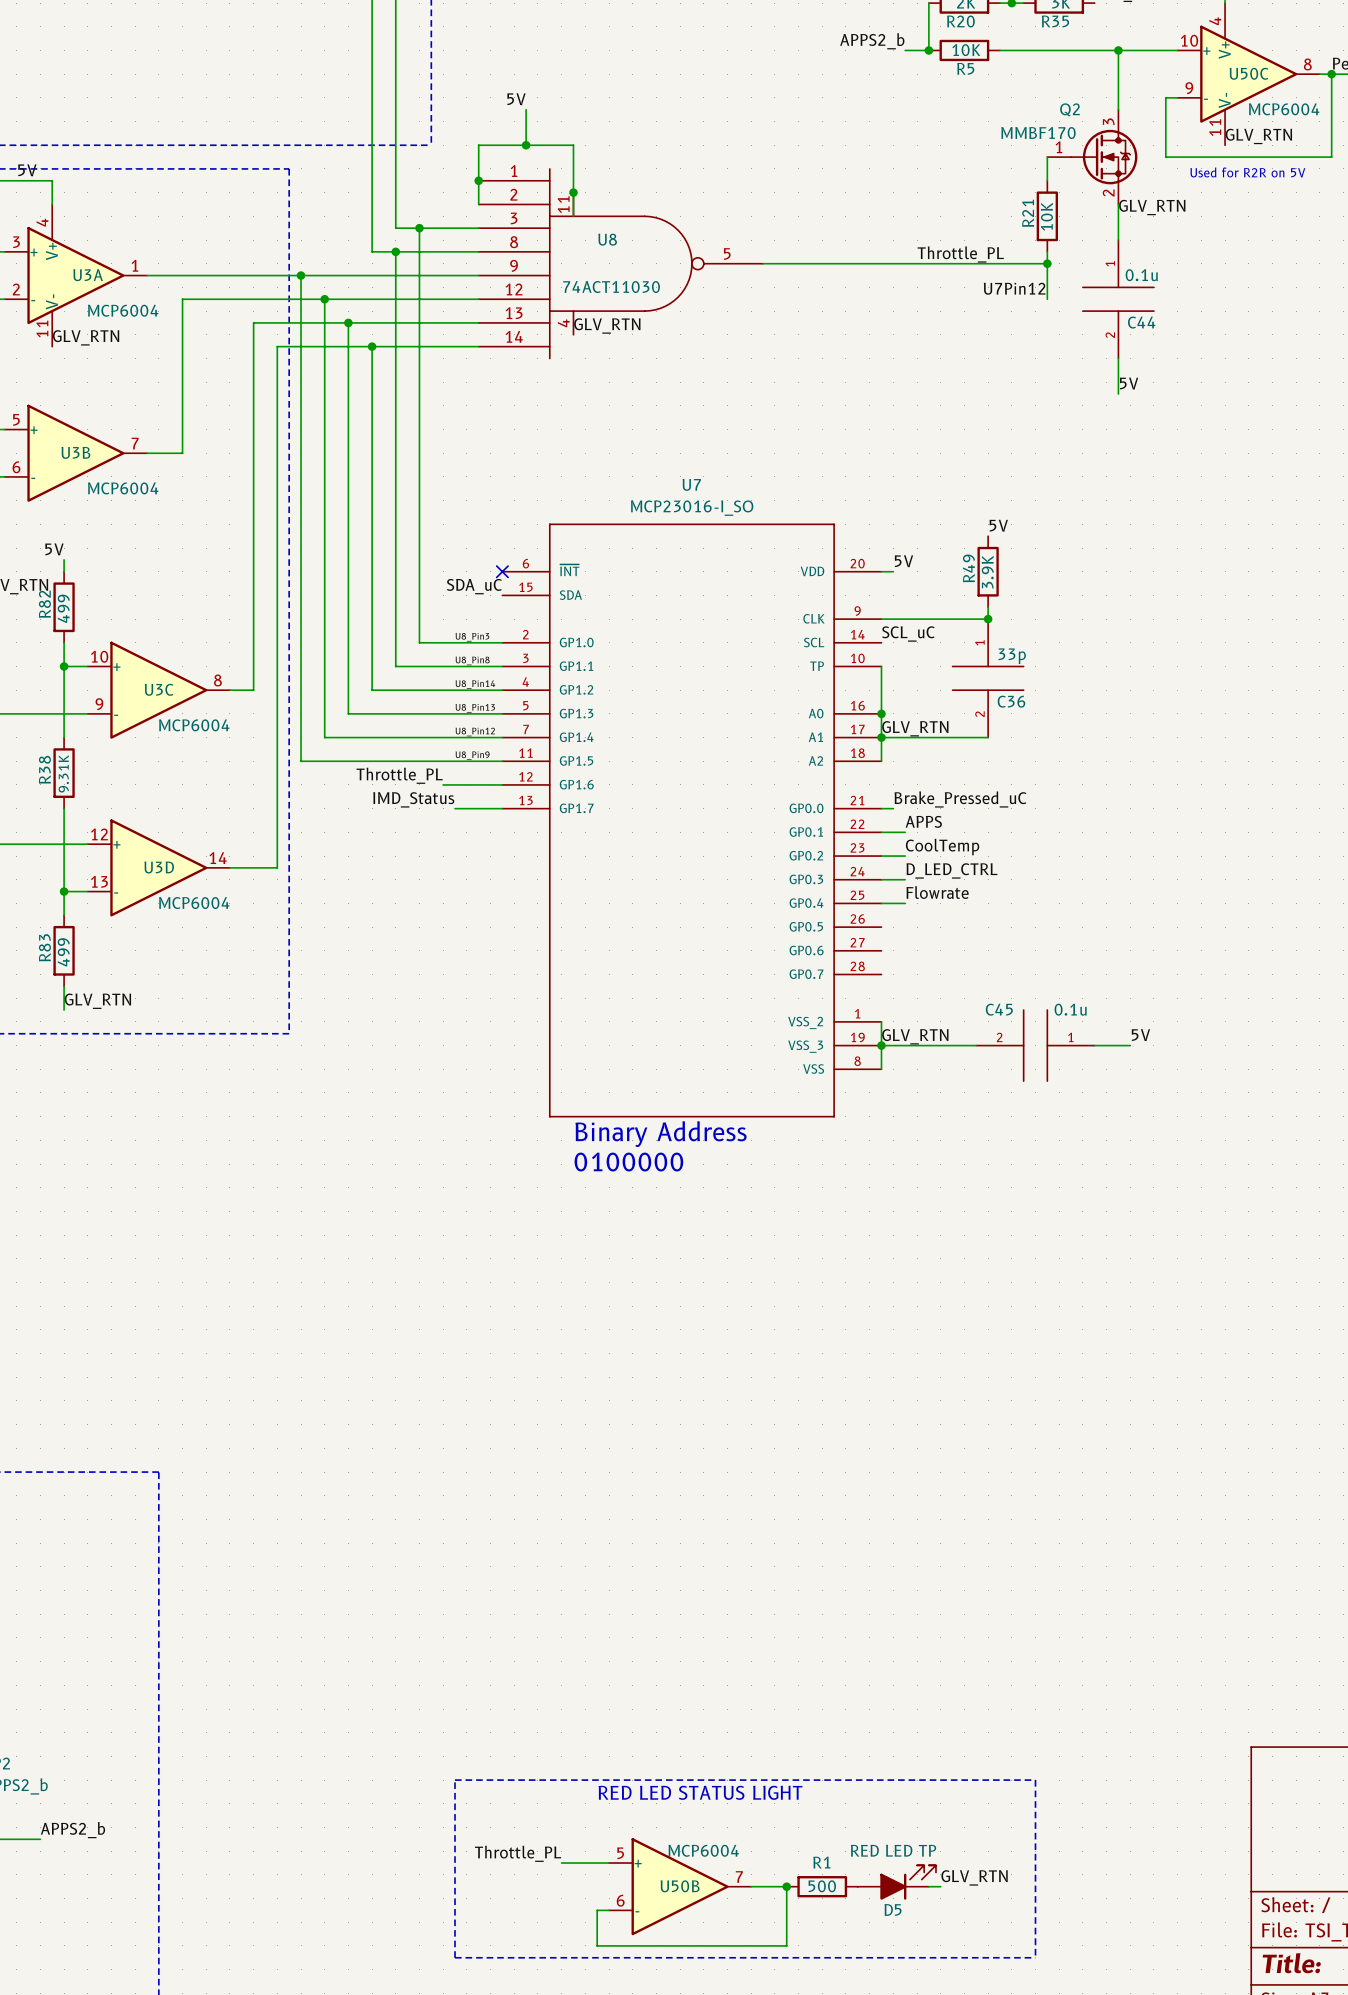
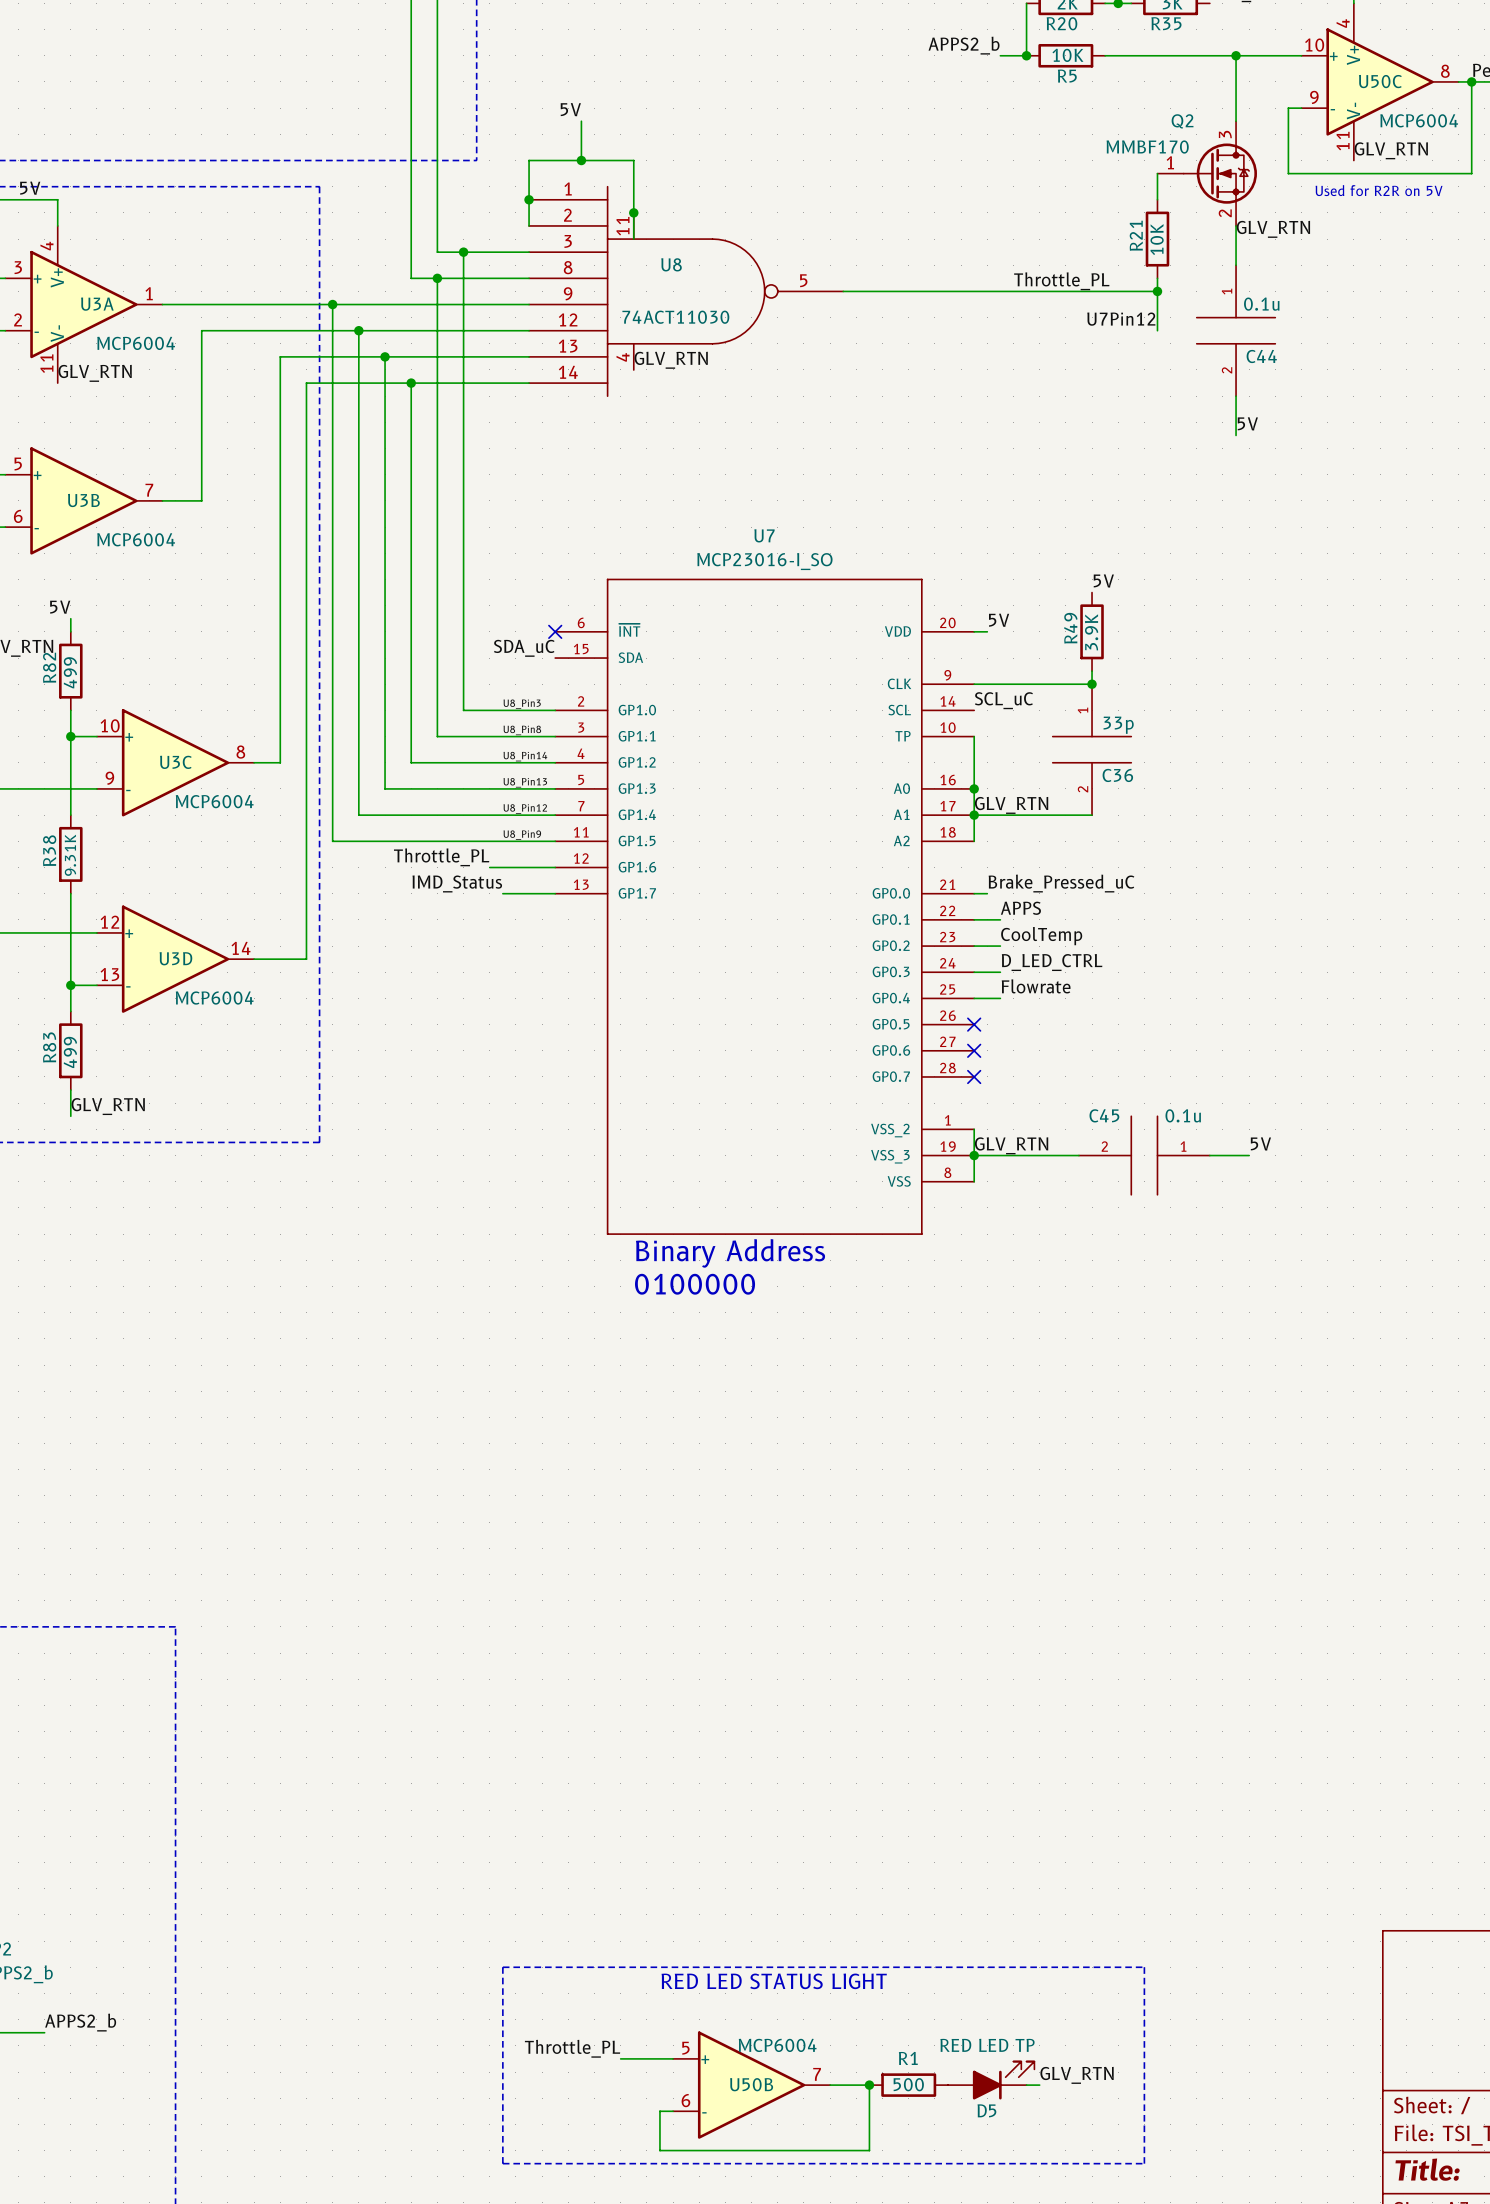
no-connect mark: none -> (974, 1024)
no-connect mark: none -> (974, 1050)
no-connect mark: none -> (974, 1076)

